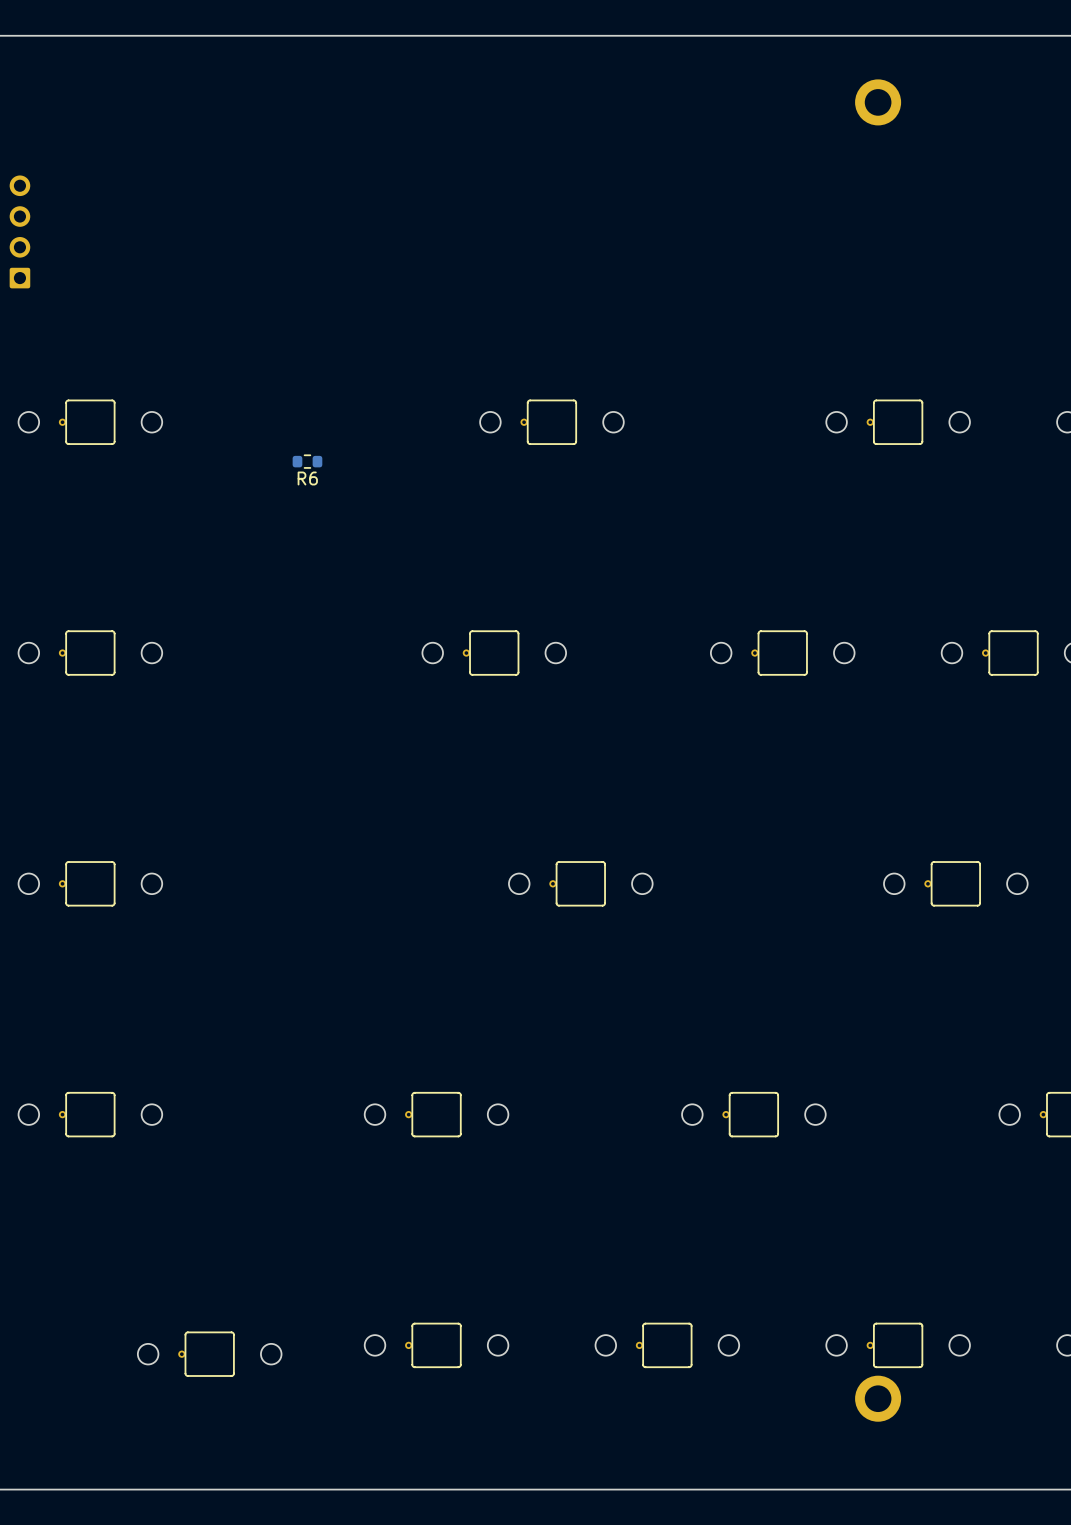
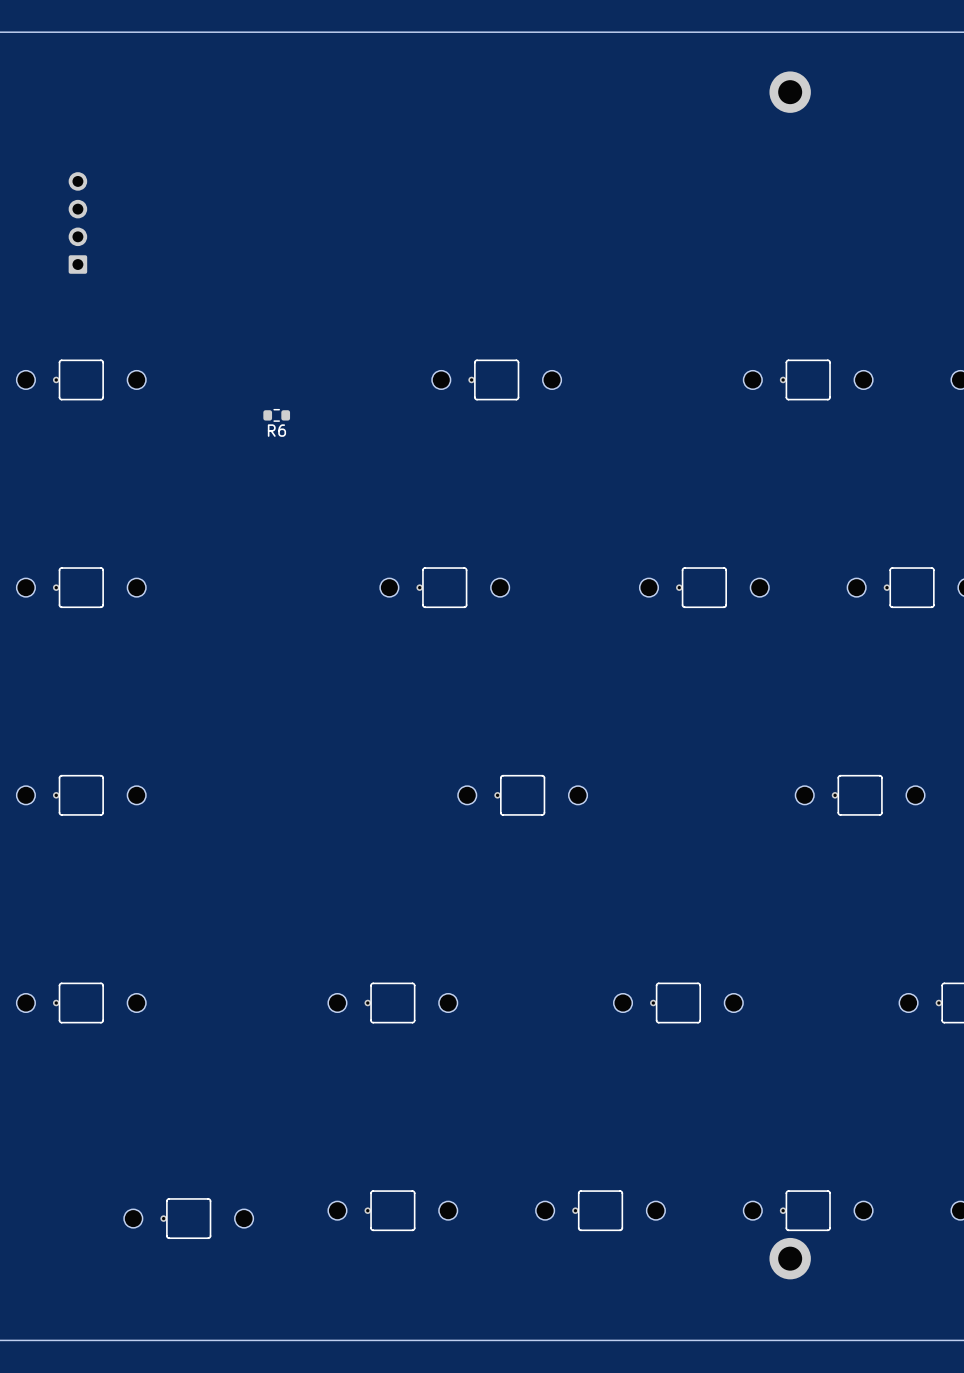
part position: (19, 231) -> (77, 222)

